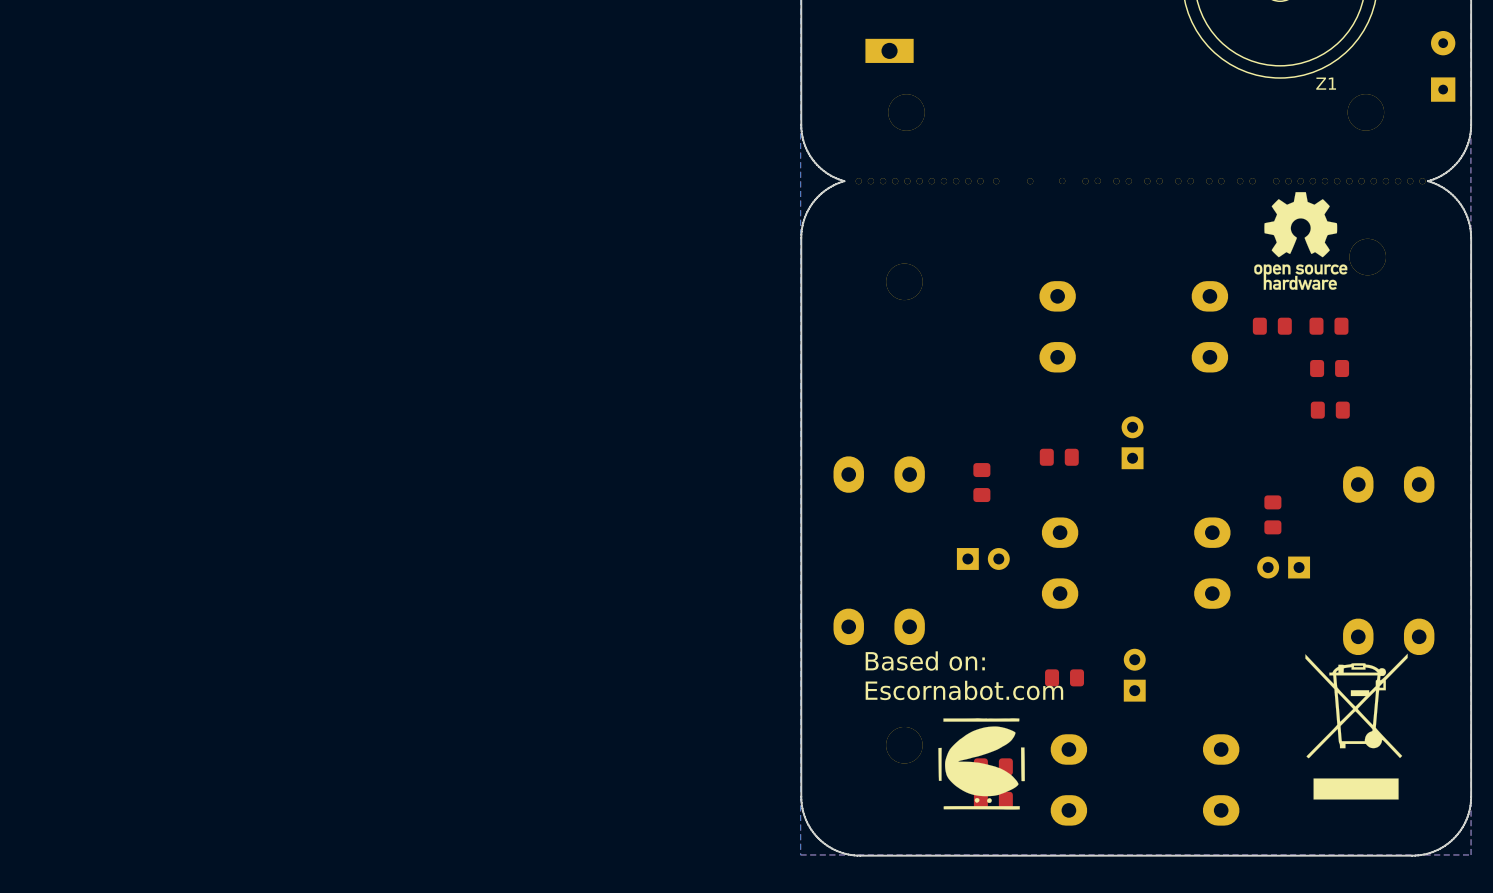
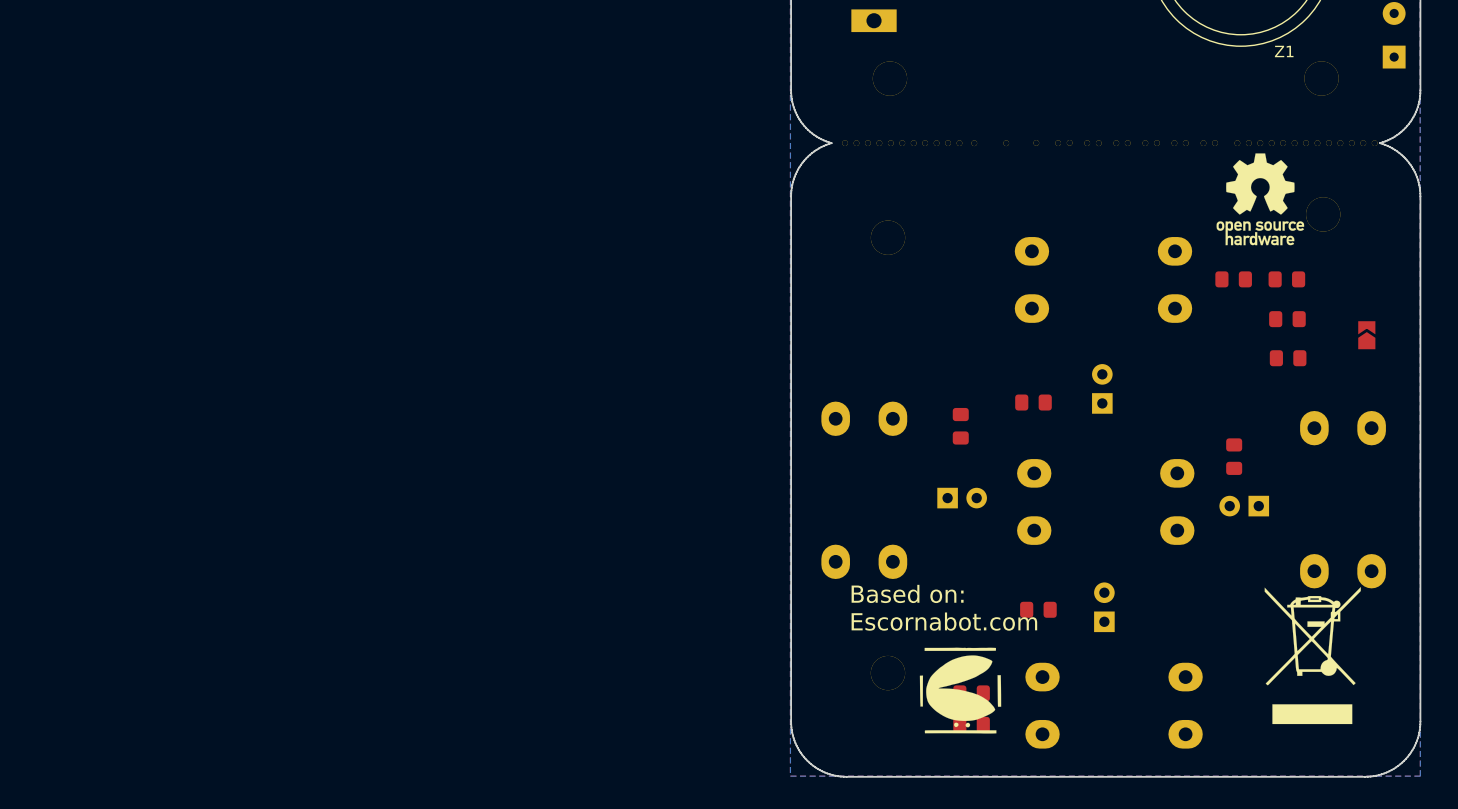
part: none -> (1366, 335)

